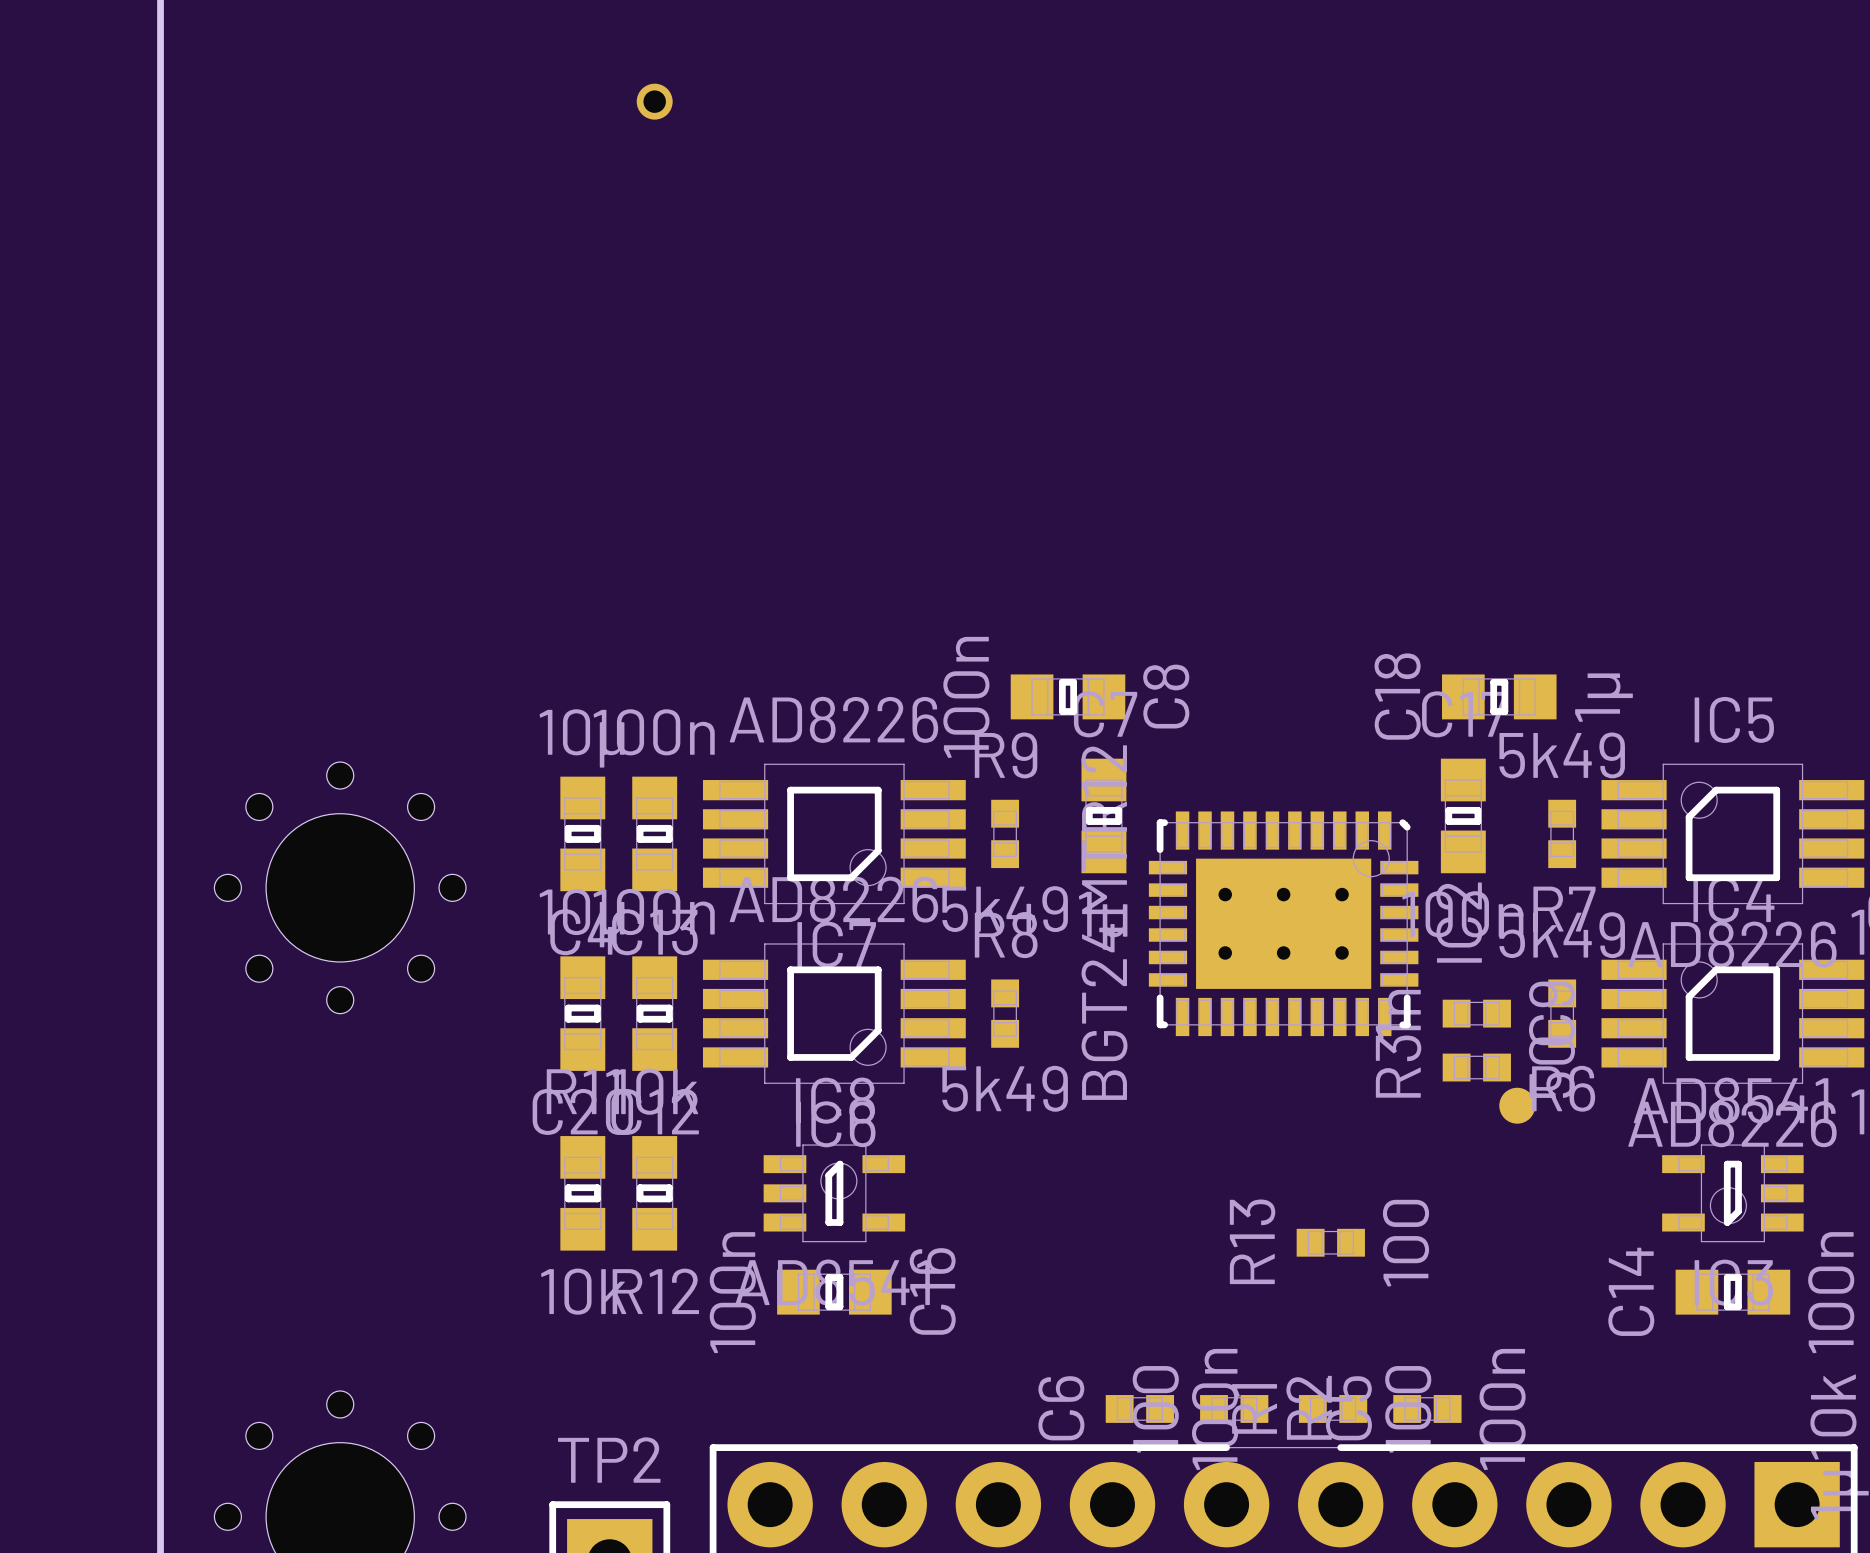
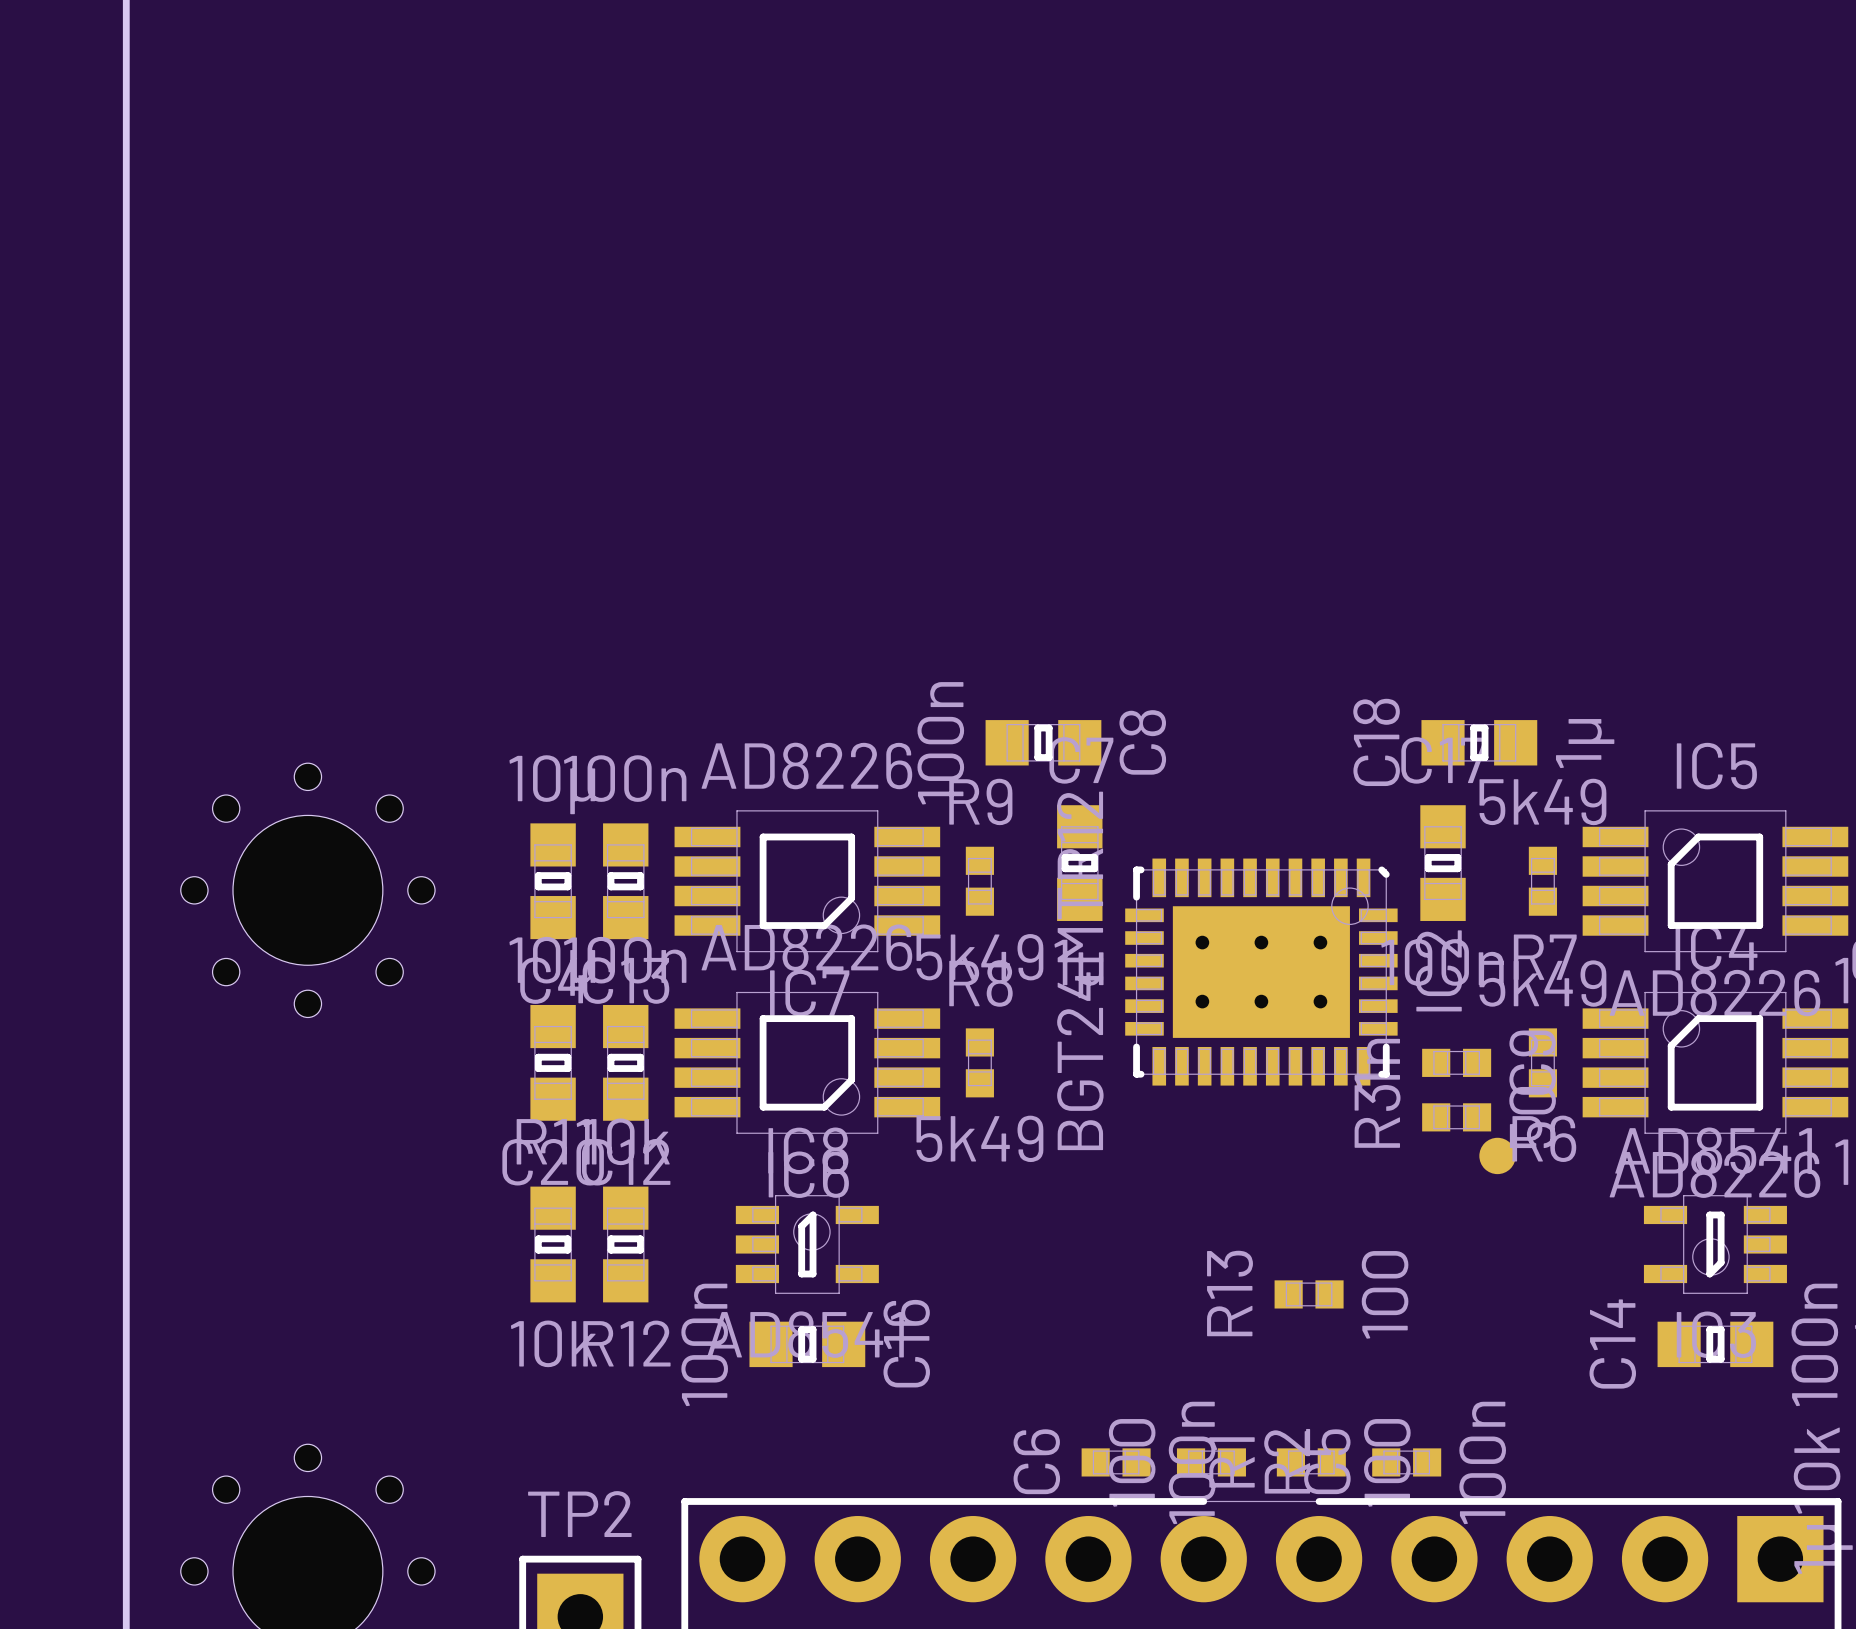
part: (654, 101) -> none
part position: (340, 887) -> (307, 890)

